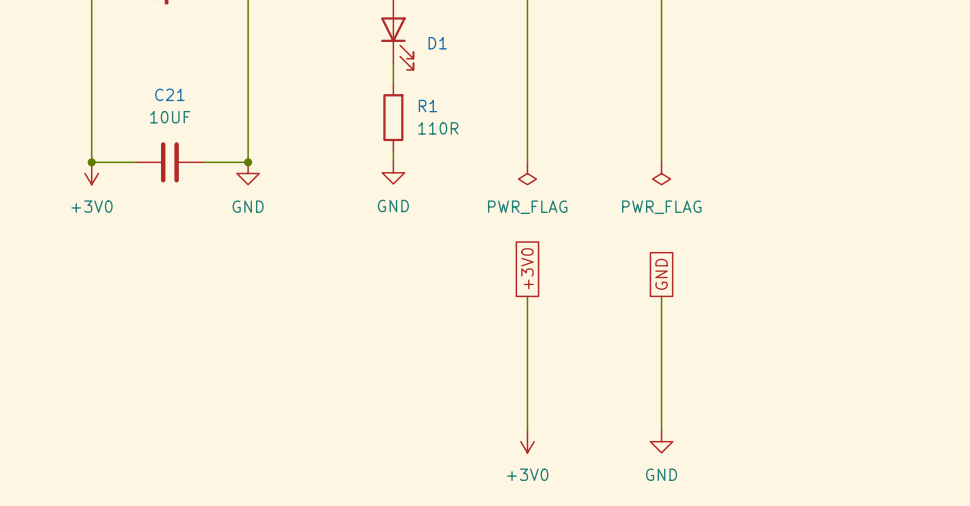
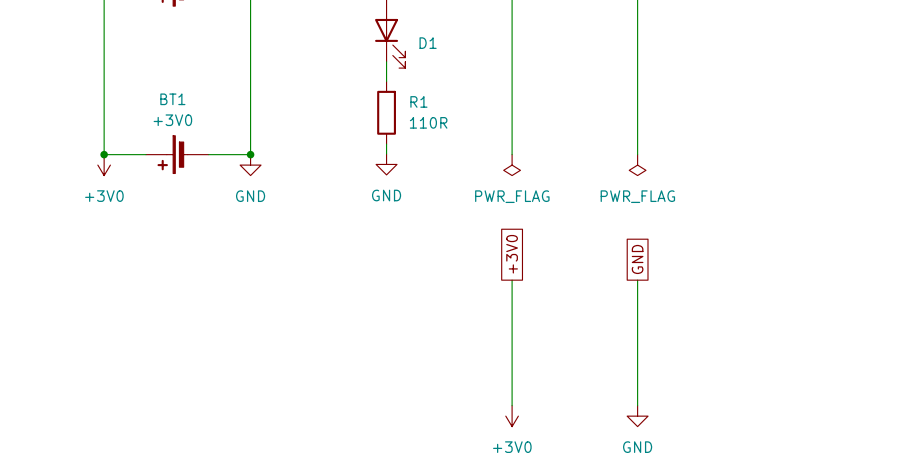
C21: 10UF (169, 162) -> none
BT1: none -> +3V0 (177, 154)

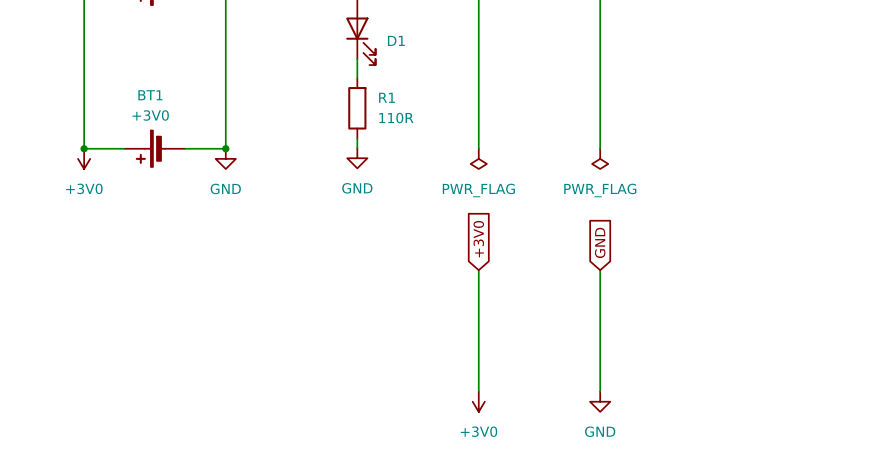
global label shape: passive (512, 254) -> input (478, 239)
global label shape: passive (637, 259) -> input (600, 242)

